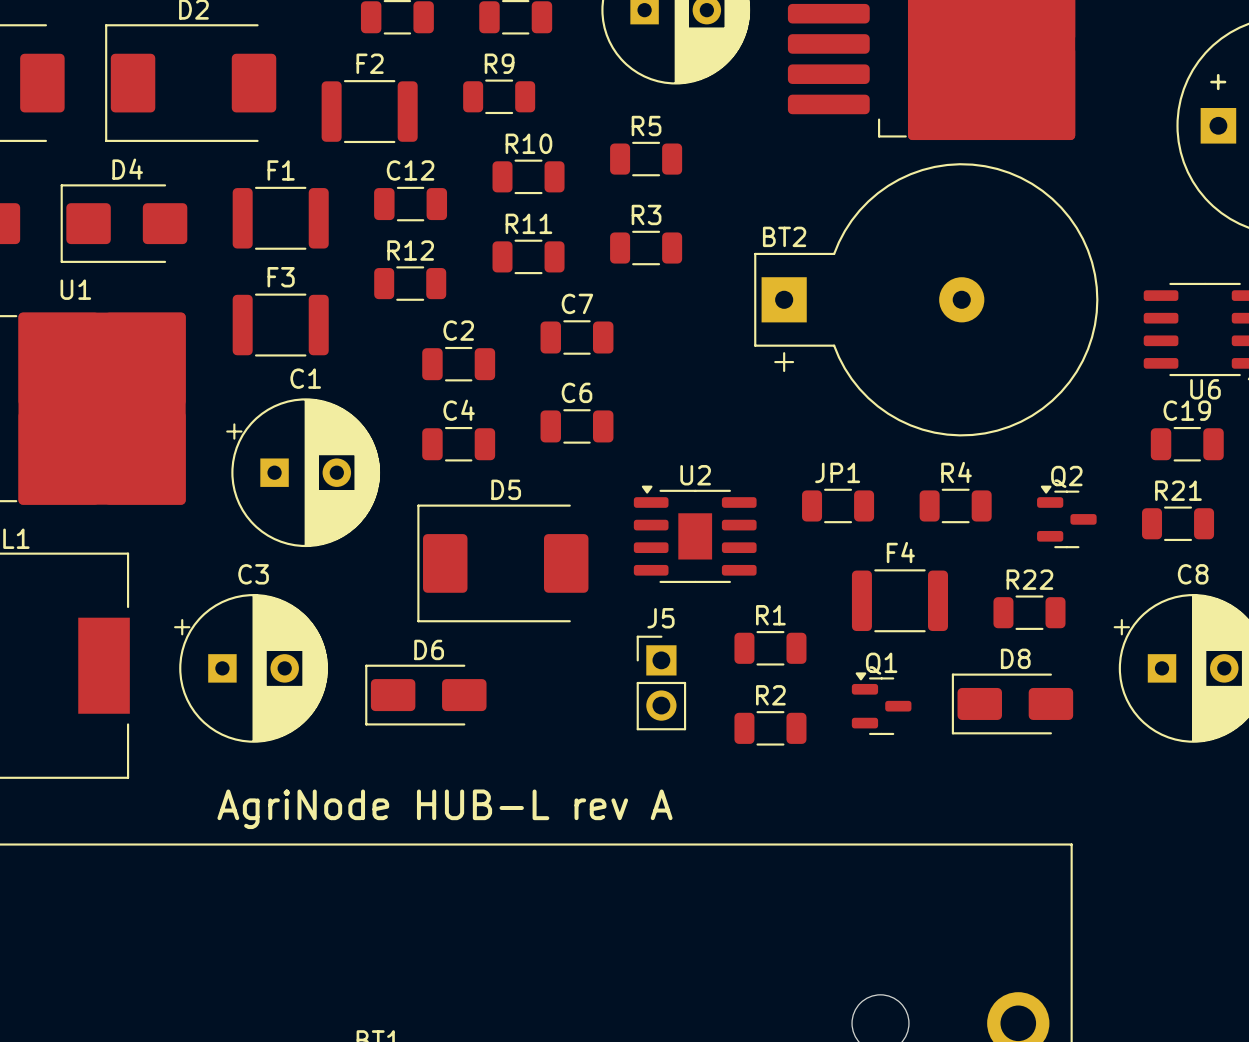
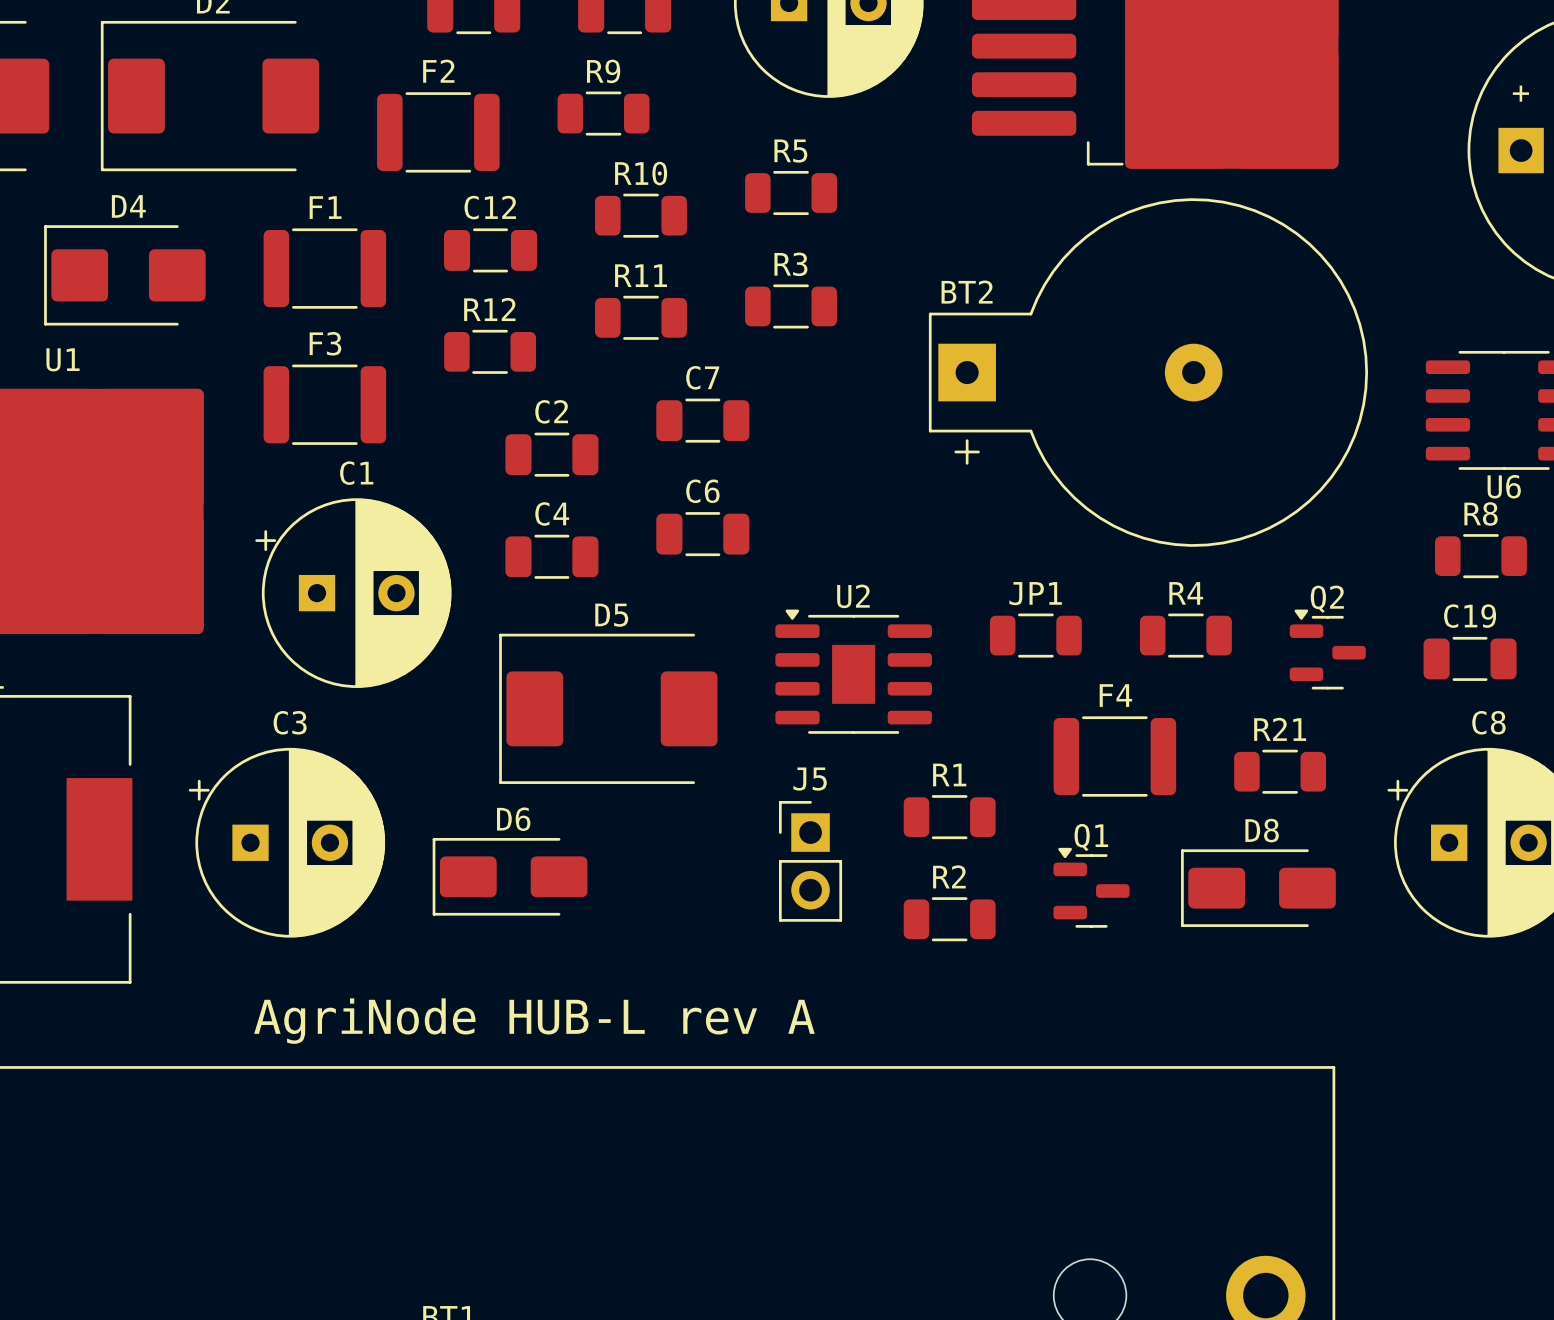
R8: none -> (1480, 556)
C19 position: (1187, 444) -> (1470, 658)
R21: (1178, 523) -> none
R22 name: R22 (1029, 579) -> R21 (1280, 729)

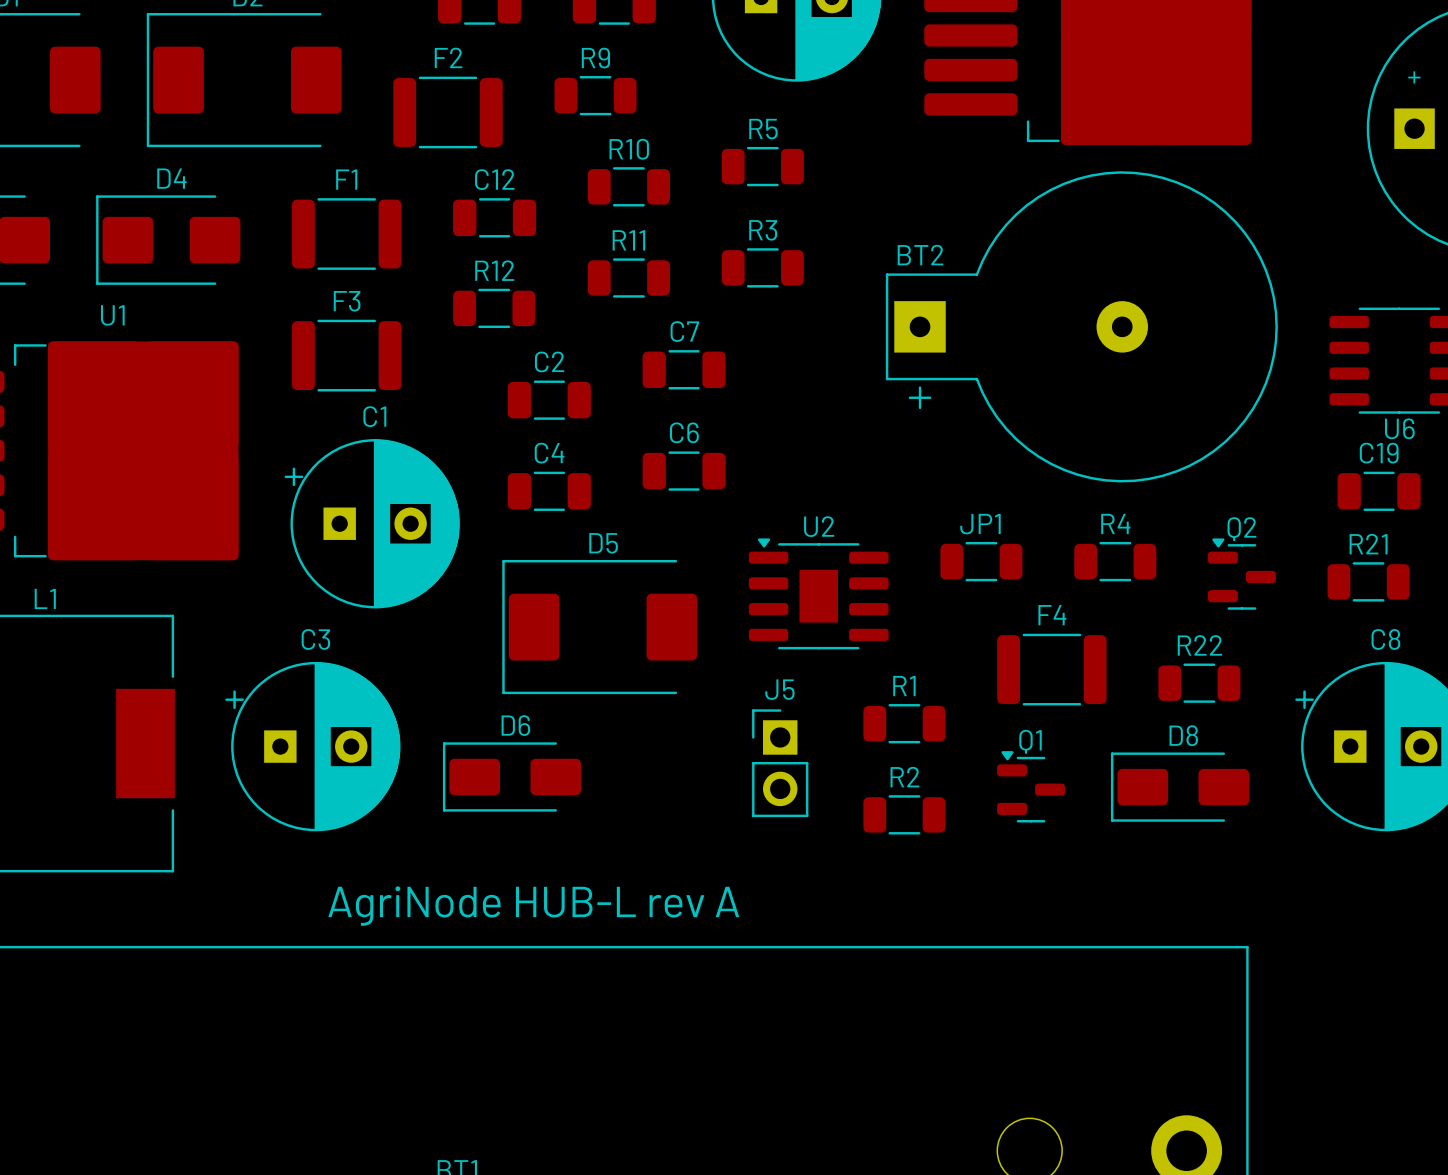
R8: (1480, 556) -> none
R21: none -> (1368, 581)
C19 position: (1470, 658) -> (1379, 491)
R21 name: R21 (1280, 729) -> R22 (1199, 645)

